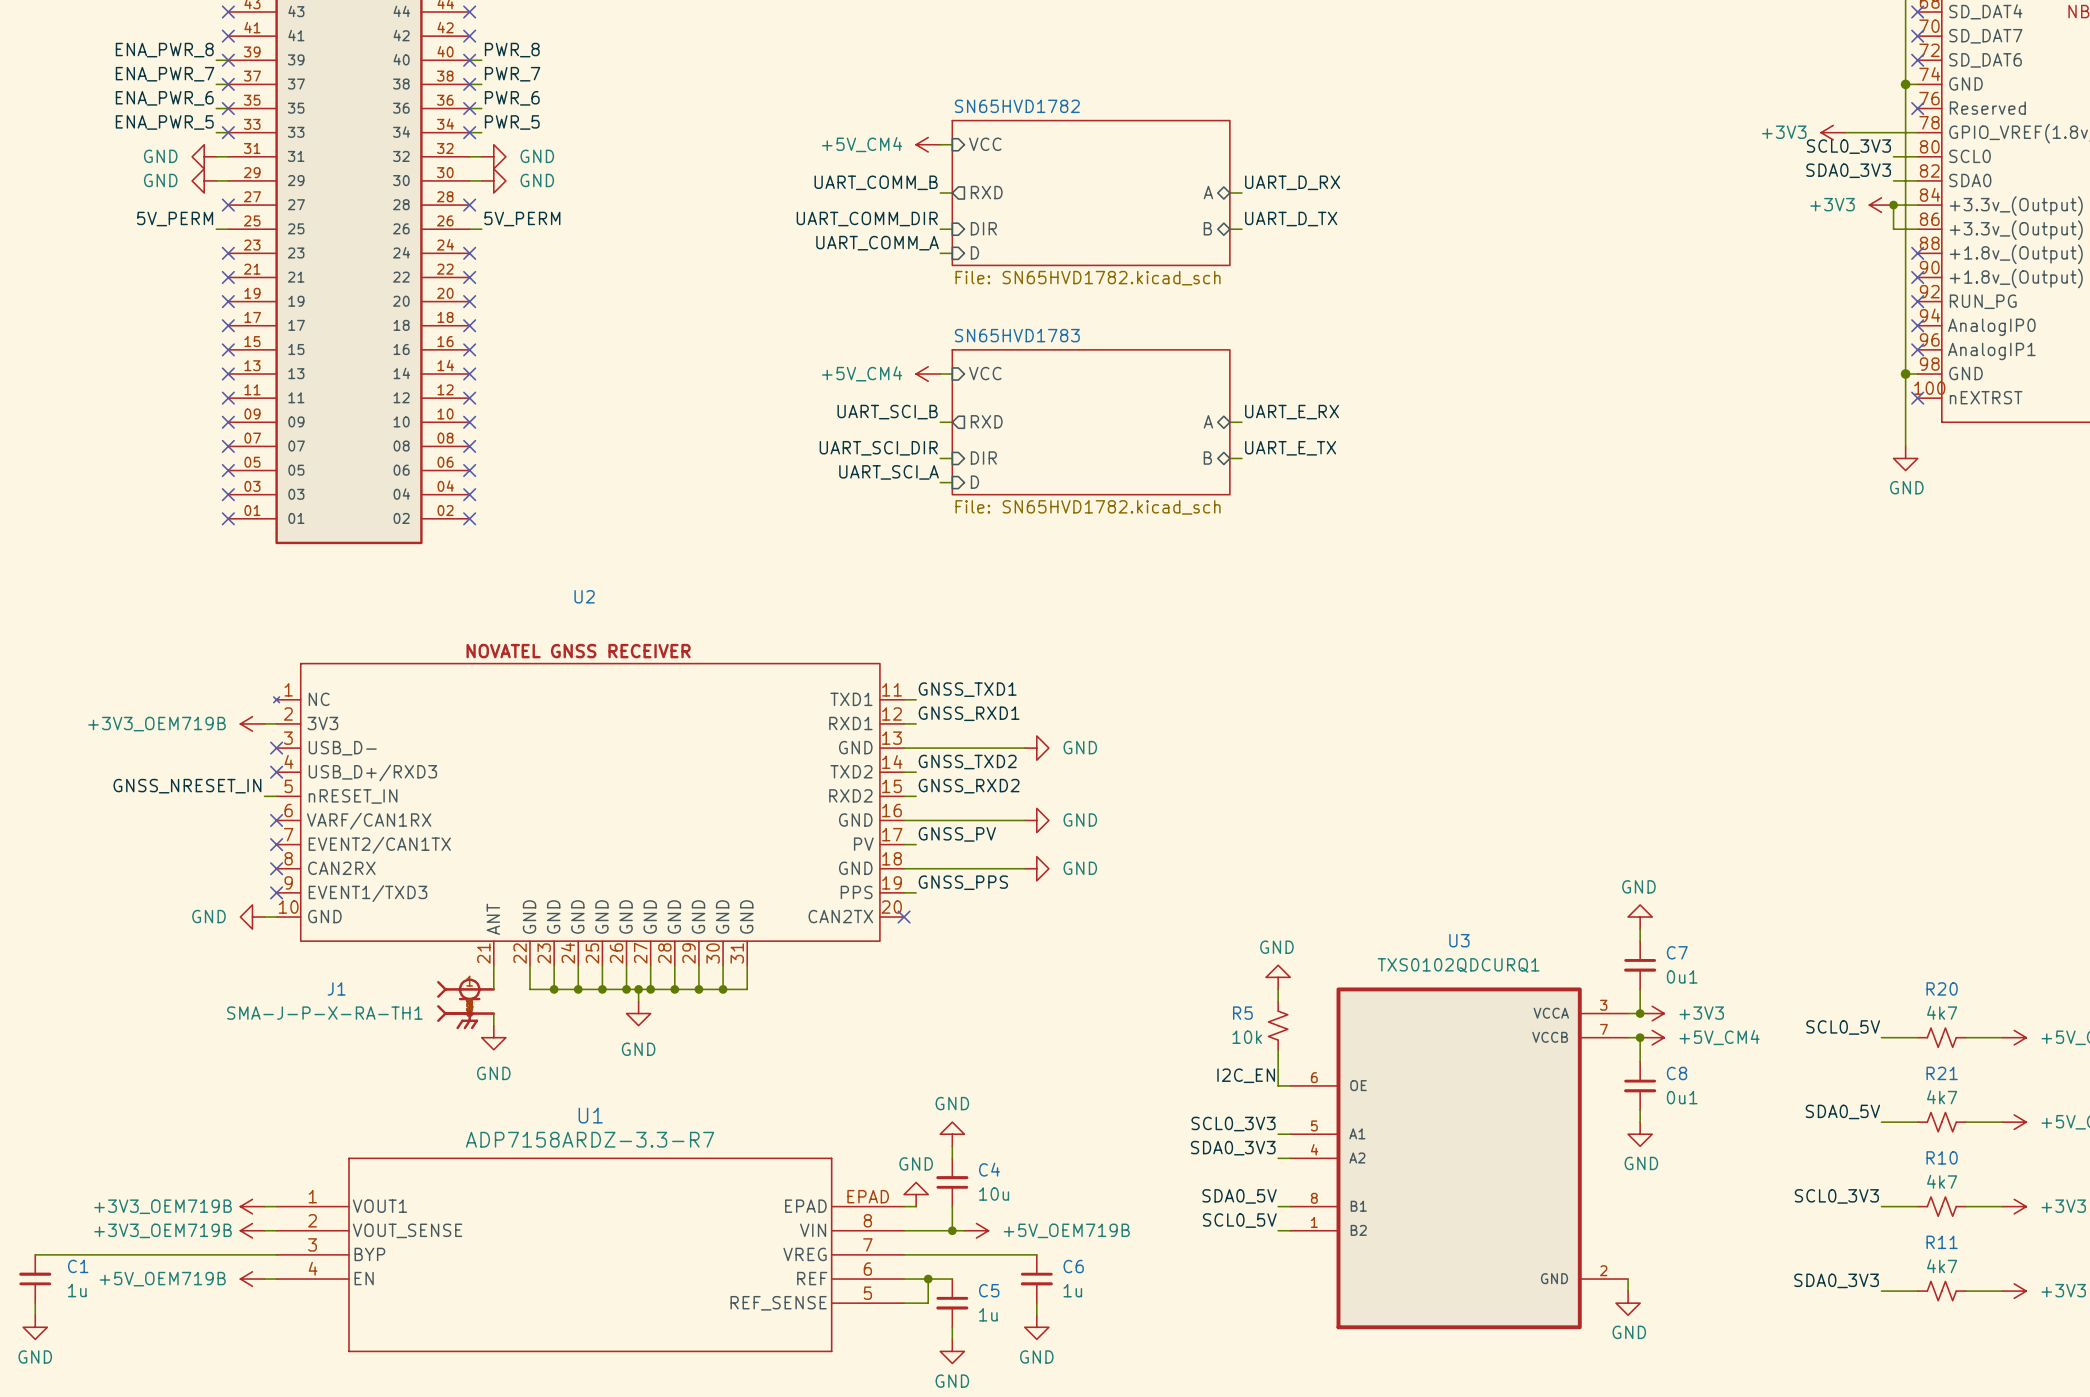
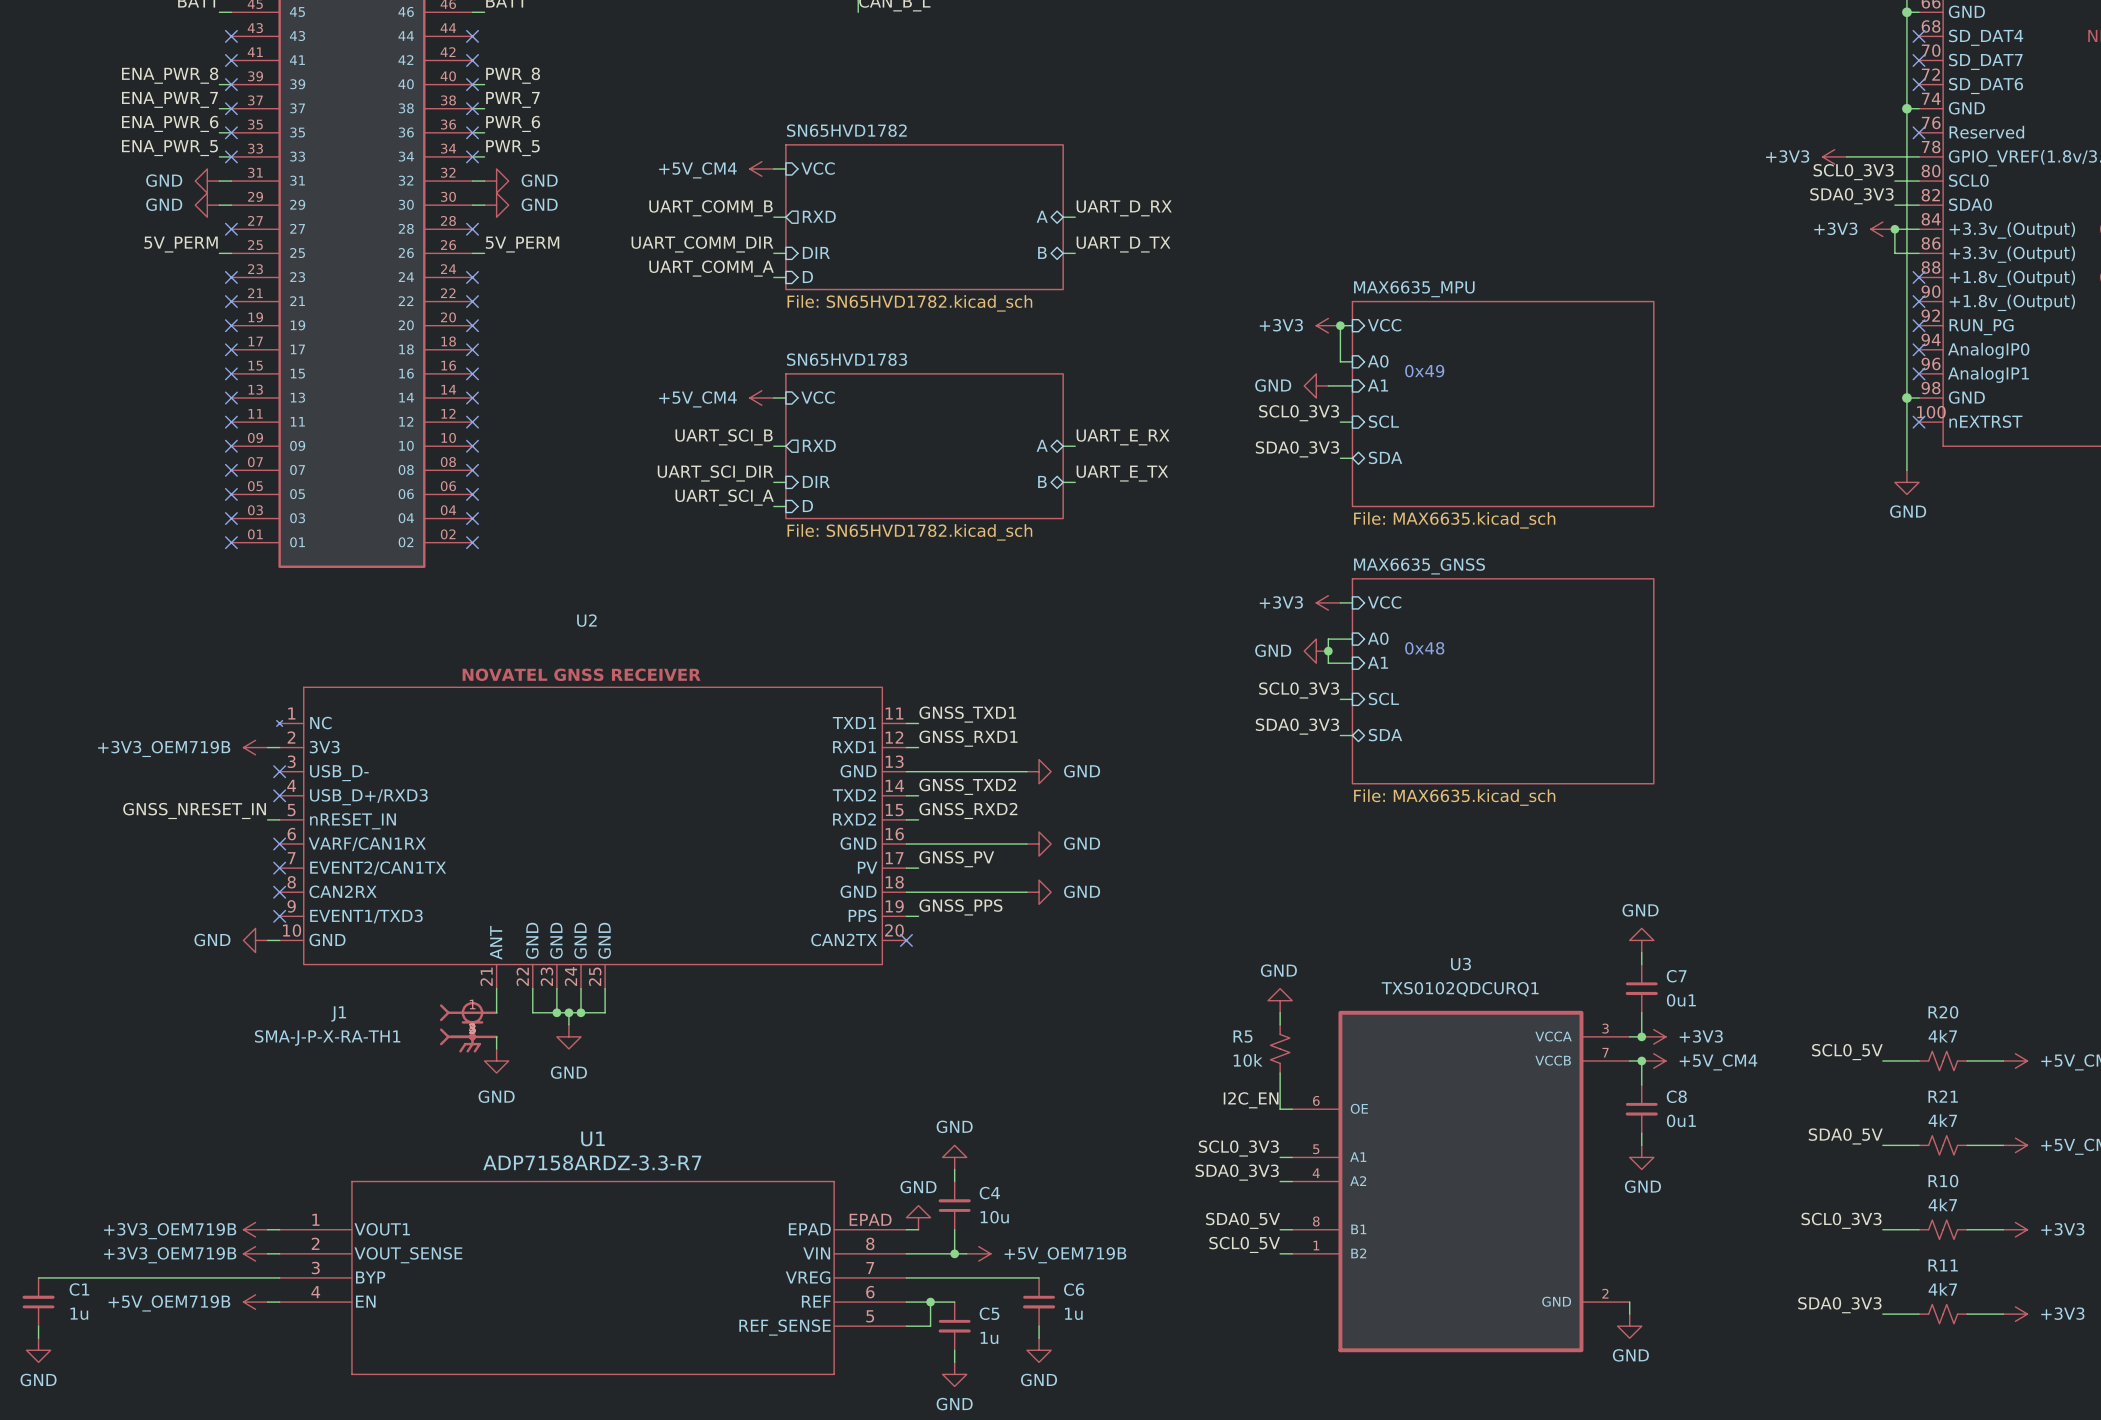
power symbol: none -> +5V_CM4 (761, 168)
sheet pin: none -> VCC (818, 168)
power symbol: +5V_CM4 (928, 144) -> none
wire: (940, 144) (952, 144) -> (773, 168) (785, 168)
sheet pin: VCC (985, 144) -> none
label position: UART_COMM_B (876, 182) -> UART_COMM_B (711, 208)
label position: UART_D_RX (1292, 182) -> UART_D_RX (1124, 208)
sheet pin: none -> RXD (819, 216)
sheet pin: RXD (986, 192) -> none
sheet pin: none -> A (1042, 216)
sheet pin: A (1208, 192) -> none
wire: (940, 193) (952, 193) -> (773, 217) (785, 217)
sheet SN65HVD1782 position: (1091, 193) -> (924, 217)
wire: (1229, 193) (1241, 193) -> (1063, 217) (1075, 217)
label position: UART_COMM_DIR (867, 219) -> UART_COMM_DIR (702, 244)
label position: UART_D_TX (1291, 219) -> UART_D_TX (1123, 244)
sheet pin: none -> DIR (816, 252)
sheet pin: DIR (983, 228) -> none
sheet pin: none -> B (1042, 252)
sheet pin: B (1207, 228) -> none
wire: (940, 229) (952, 229) -> (773, 253) (785, 253)
wire: (1229, 229) (1241, 229) -> (1063, 253) (1075, 253)
label position: UART_COMM_A (877, 243) -> UART_COMM_A (711, 268)
sheet pin: none -> D (807, 277)
sheet pin: D (974, 252) -> none
wire: (940, 253) (952, 253) -> (773, 277) (785, 277)
power symbol: none -> +3V3 (1328, 325)
junction: none -> (1340, 325)
wire: none -> (1352, 325) (1340, 325) (1340, 361) (1352, 361)
sheet pin: none -> VCC (1384, 325)
sheet pin: none -> A0 (1378, 361)
text: none -> 0x49 (1424, 371)
power symbol: none -> GND (1316, 385)
wire: none -> (1328, 385) (1352, 385)
sheet pin: none -> A1 (1377, 385)
sheet pin: none -> VCC (818, 397)
sheet pin: VCC (985, 373) -> none
power symbol: none -> +5V_CM4 (761, 398)
power symbol: +5V_CM4 (928, 374) -> none
wire: (940, 374) (952, 374) -> (773, 398) (785, 398)
sheet MAX6635_MPU: none -> File: MAX6635.kicad_sch (1503, 404)
label: none -> SCL0_3V3 (1299, 413)
sheet pin: none -> SCL (1383, 421)
wire: none -> (1340, 422) (1352, 422)
label position: UART_SCI_B (887, 412) -> UART_SCI_B (724, 437)
label position: UART_E_RX (1292, 412) -> UART_E_RX (1123, 437)
sheet pin: none -> RXD (819, 445)
sheet pin: RXD (986, 421) -> none
sheet pin: none -> A (1042, 445)
sheet pin: A (1208, 421) -> none
wire: (940, 422) (952, 422) -> (773, 446) (785, 446)
sheet SN65HVD1783 position: (1091, 422) -> (924, 446)
wire: (1229, 422) (1241, 422) -> (1063, 446) (1075, 446)
label: none -> SDA0_3V3 (1297, 449)
sheet pin: none -> SDA (1385, 457)
wire: none -> (1340, 458) (1352, 458)
label position: UART_SCI_DIR (878, 448) -> UART_SCI_DIR (715, 473)
label position: UART_E_TX (1290, 448) -> UART_E_TX (1122, 473)
sheet pin: none -> DIR (816, 481)
wire: (940, 458) (952, 458) -> (773, 482) (785, 482)
sheet pin: DIR (983, 458) -> none
sheet pin: none -> B (1042, 481)
sheet pin: B (1207, 458) -> none
wire: (1229, 458) (1241, 458) -> (1063, 482) (1075, 482)
label position: UART_SCI_A (889, 472) -> UART_SCI_A (724, 497)
sheet pin: none -> D (807, 506)
wire: (940, 482) (952, 482) -> (773, 506) (785, 506)
sheet pin: D (974, 482) -> none
sheet pin: none -> VCC (1384, 602)
power symbol: none -> +3V3 (1328, 602)
wire: none -> (1340, 602) (1352, 602)
sheet pin: none -> A0 (1378, 638)
wire: none -> (1352, 639) (1328, 639) (1328, 663) (1352, 663)
text: none -> 0x48 (1424, 648)
power symbol: none -> GND (1316, 651)
junction: none -> (1328, 651)
sheet pin: none -> A1 (1377, 662)
sheet MAX6635_GNSS: none -> File: MAX6635.kicad_sch (1503, 681)
U2 symbol: [273, 663, 905, 966] -> [276, 687, 907, 989]
label: none -> SCL0_3V3 (1299, 690)
wire: none -> (1340, 699) (1352, 699)
sheet pin: none -> SCL (1383, 698)
label: none -> SDA0_3V3 (1297, 726)
wire: none -> (1340, 735) (1352, 735)
sheet pin: none -> SDA (1385, 735)
wire: (626, 965) (626, 989) -> none
wire: (650, 965) (650, 989) -> none
wire: (674, 965) (674, 989) -> none
wire: (698, 965) (698, 989) -> none
wire: (723, 965) (723, 989) -> none
wire: (747, 965) (747, 989) (602, 989) -> none
junction: none -> (568, 1012)
junction: (602, 989) -> none
junction: (626, 989) -> none
wire: (638, 989) (638, 1001) -> (568, 1012) (568, 1024)
junction: (638, 989) -> none
junction: (650, 989) -> none
junction: (674, 989) -> none
junction: (698, 989) -> none
junction: (723, 989) -> none
power symbol position: GND (638, 1013) -> GND (568, 1036)

